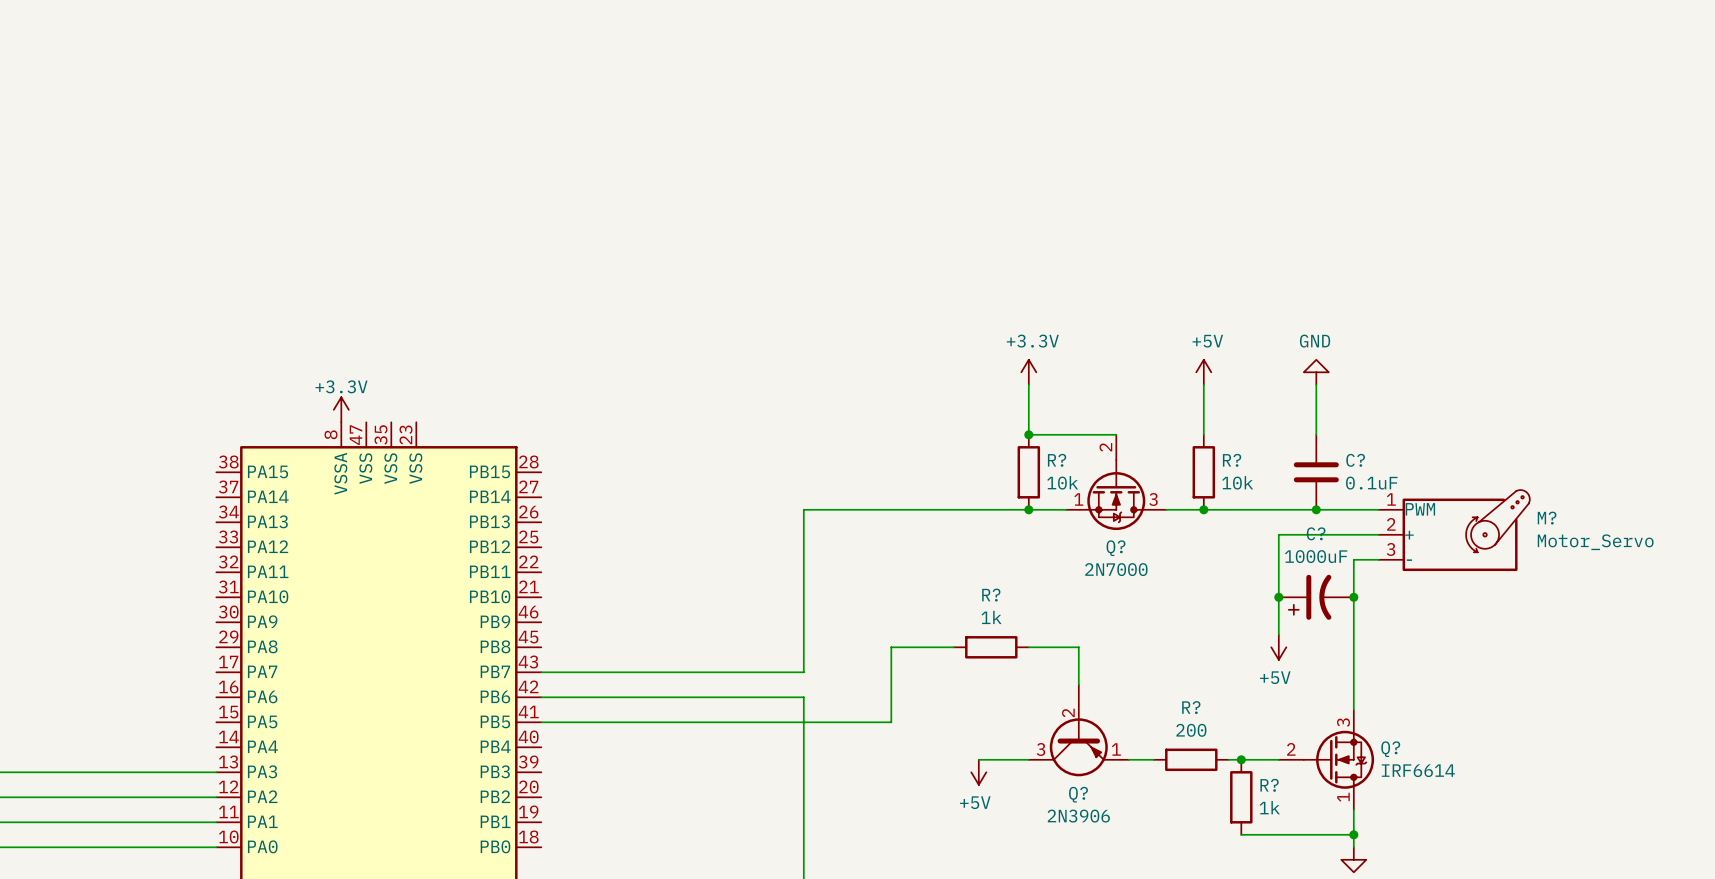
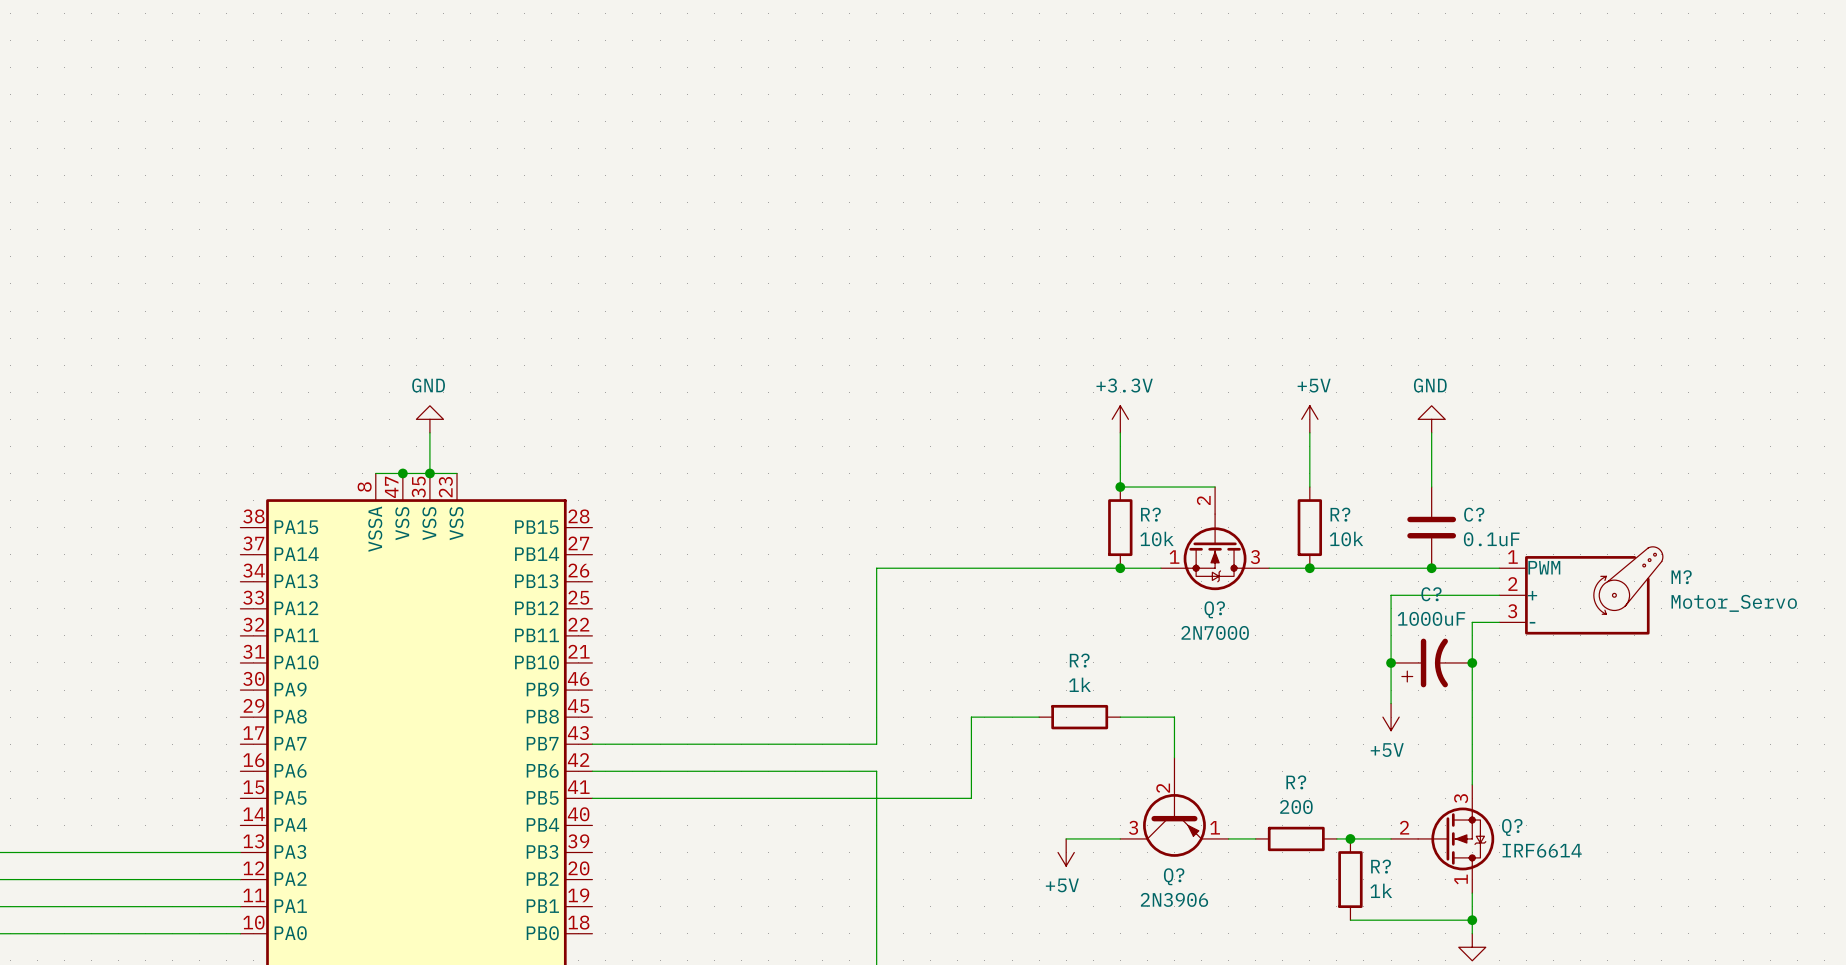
power symbol: none -> GND (429, 419)
wire: none -> (429, 432) (429, 473)
power symbol: +3.3V (341, 409) -> none
wire: none -> (375, 473) (457, 473)
junction: none -> (402, 473)
junction: none -> (429, 473)

